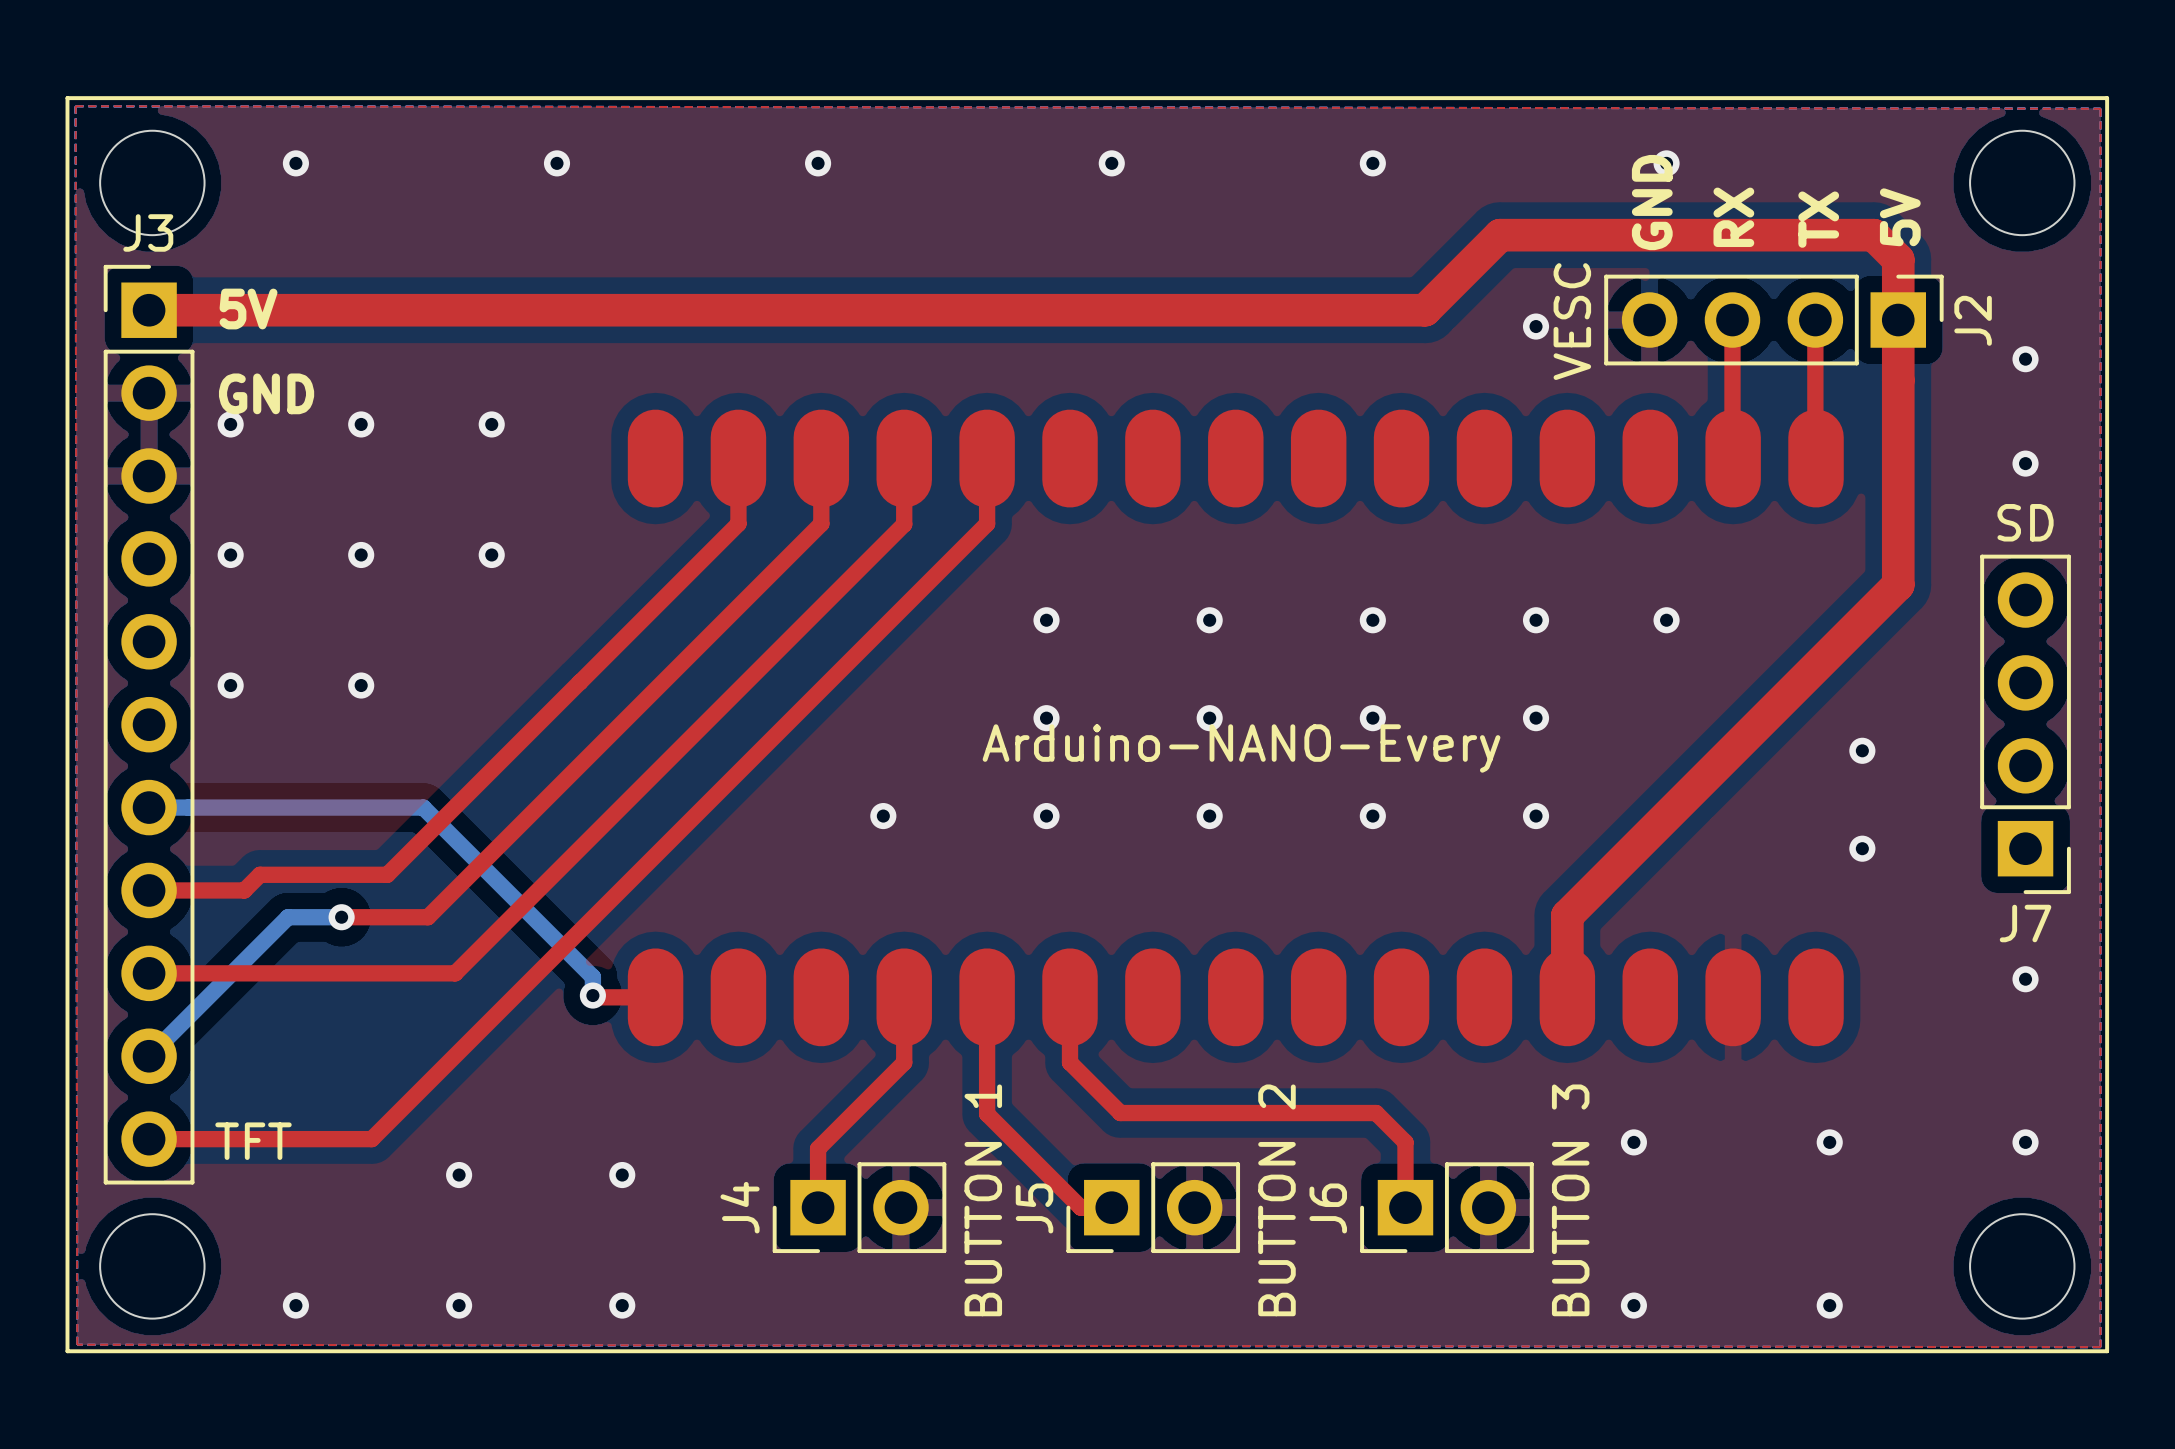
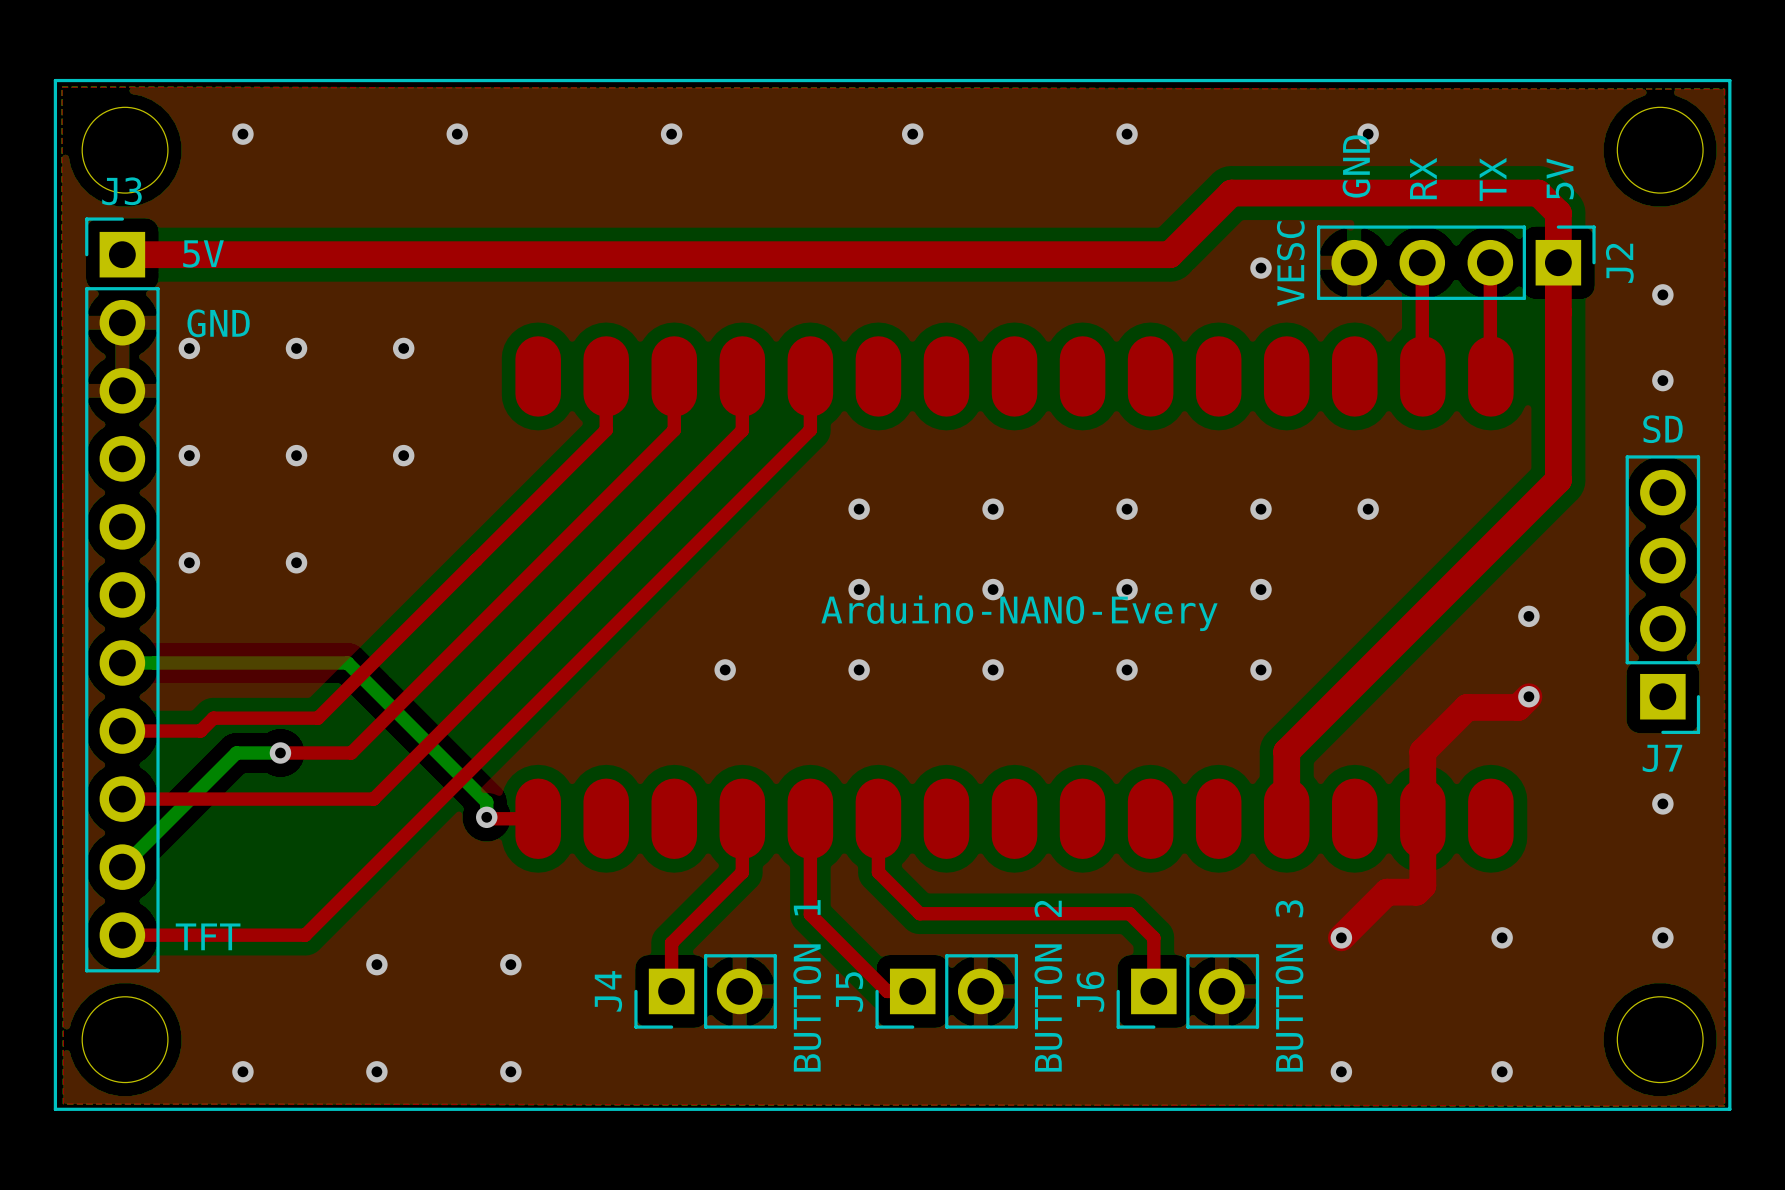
top track: none -> (1528, 696) (1518, 707) (1467, 707) (1422, 751) (1422, 885) (1416, 892) (1387, 892) (1341, 937)

